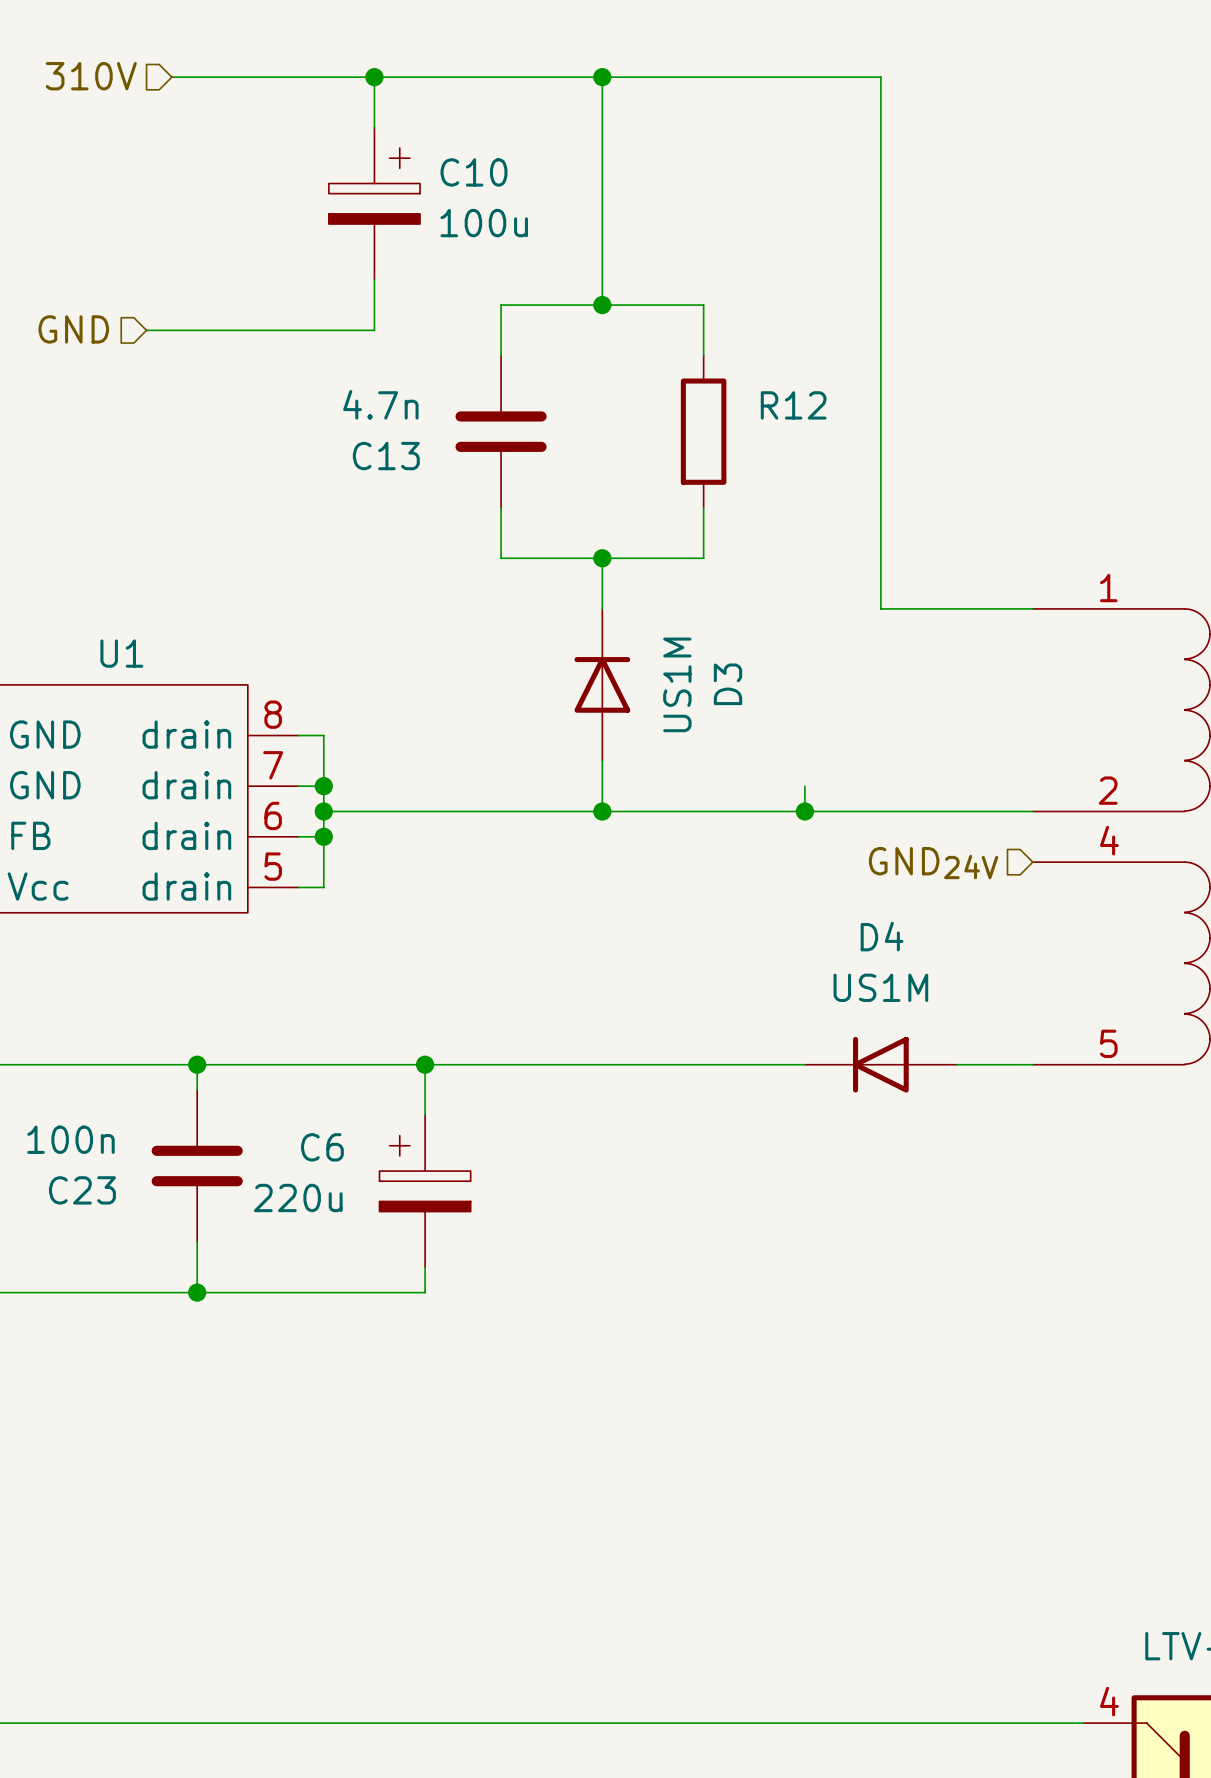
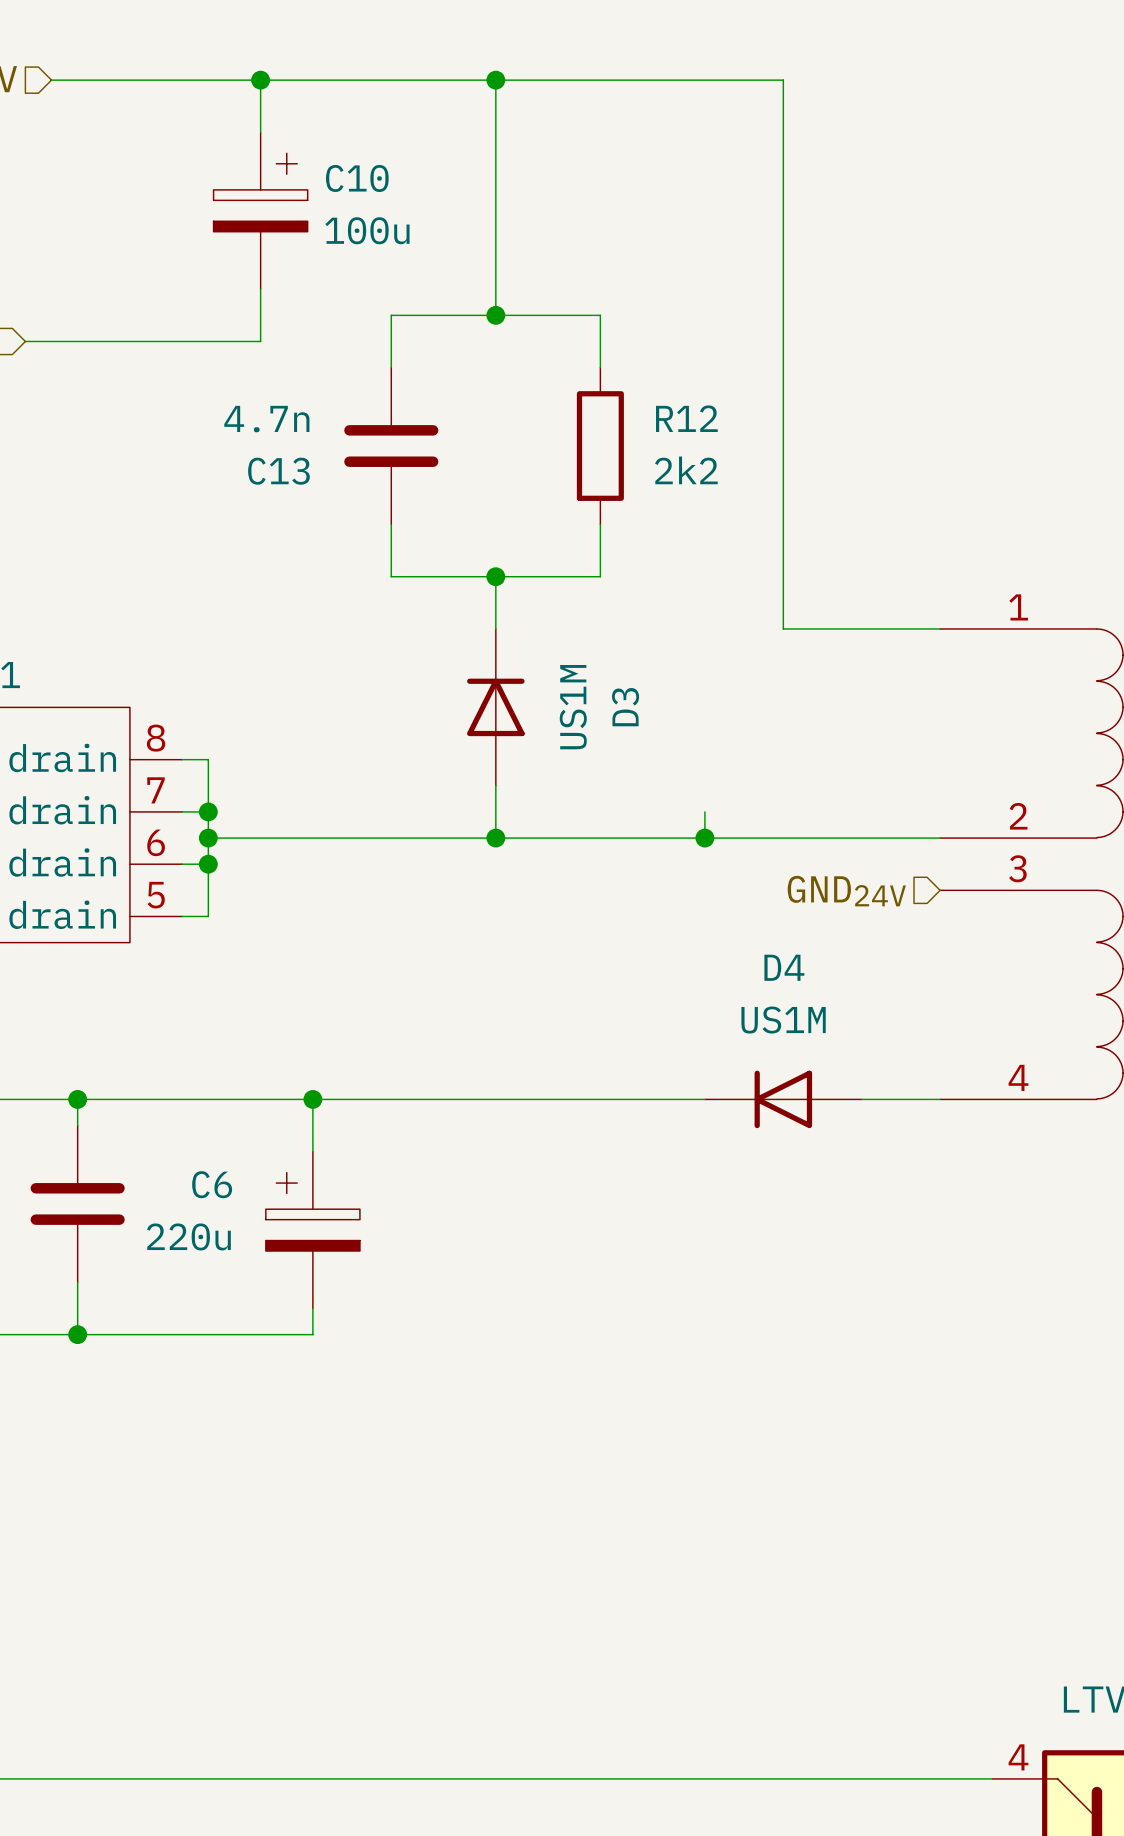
R12 value: none -> 2k2 (686, 470)
part pin number: 4 (1109, 840) -> 3 (1017, 868)
part pin number: 5 (1108, 1043) -> 4 (1018, 1077)

